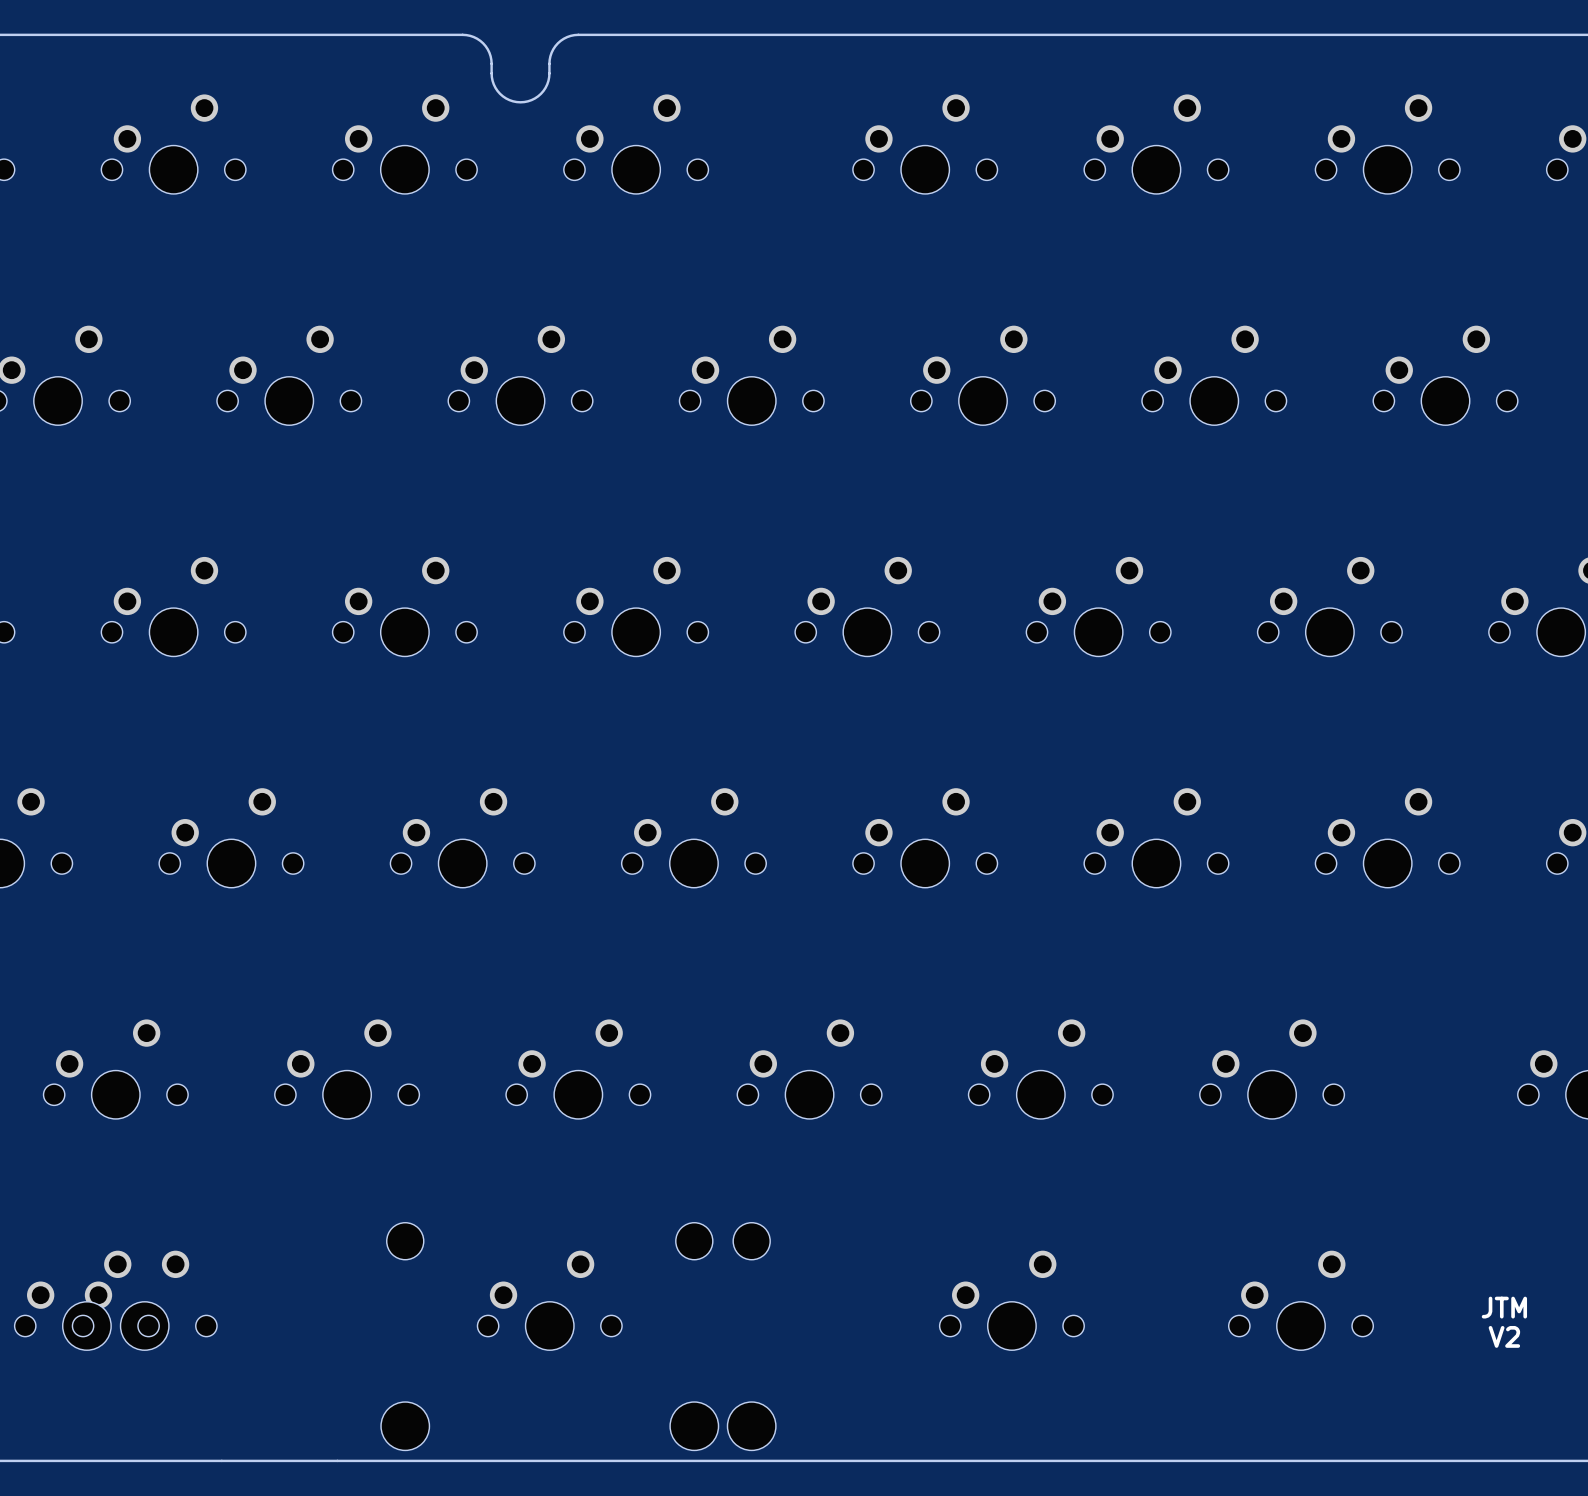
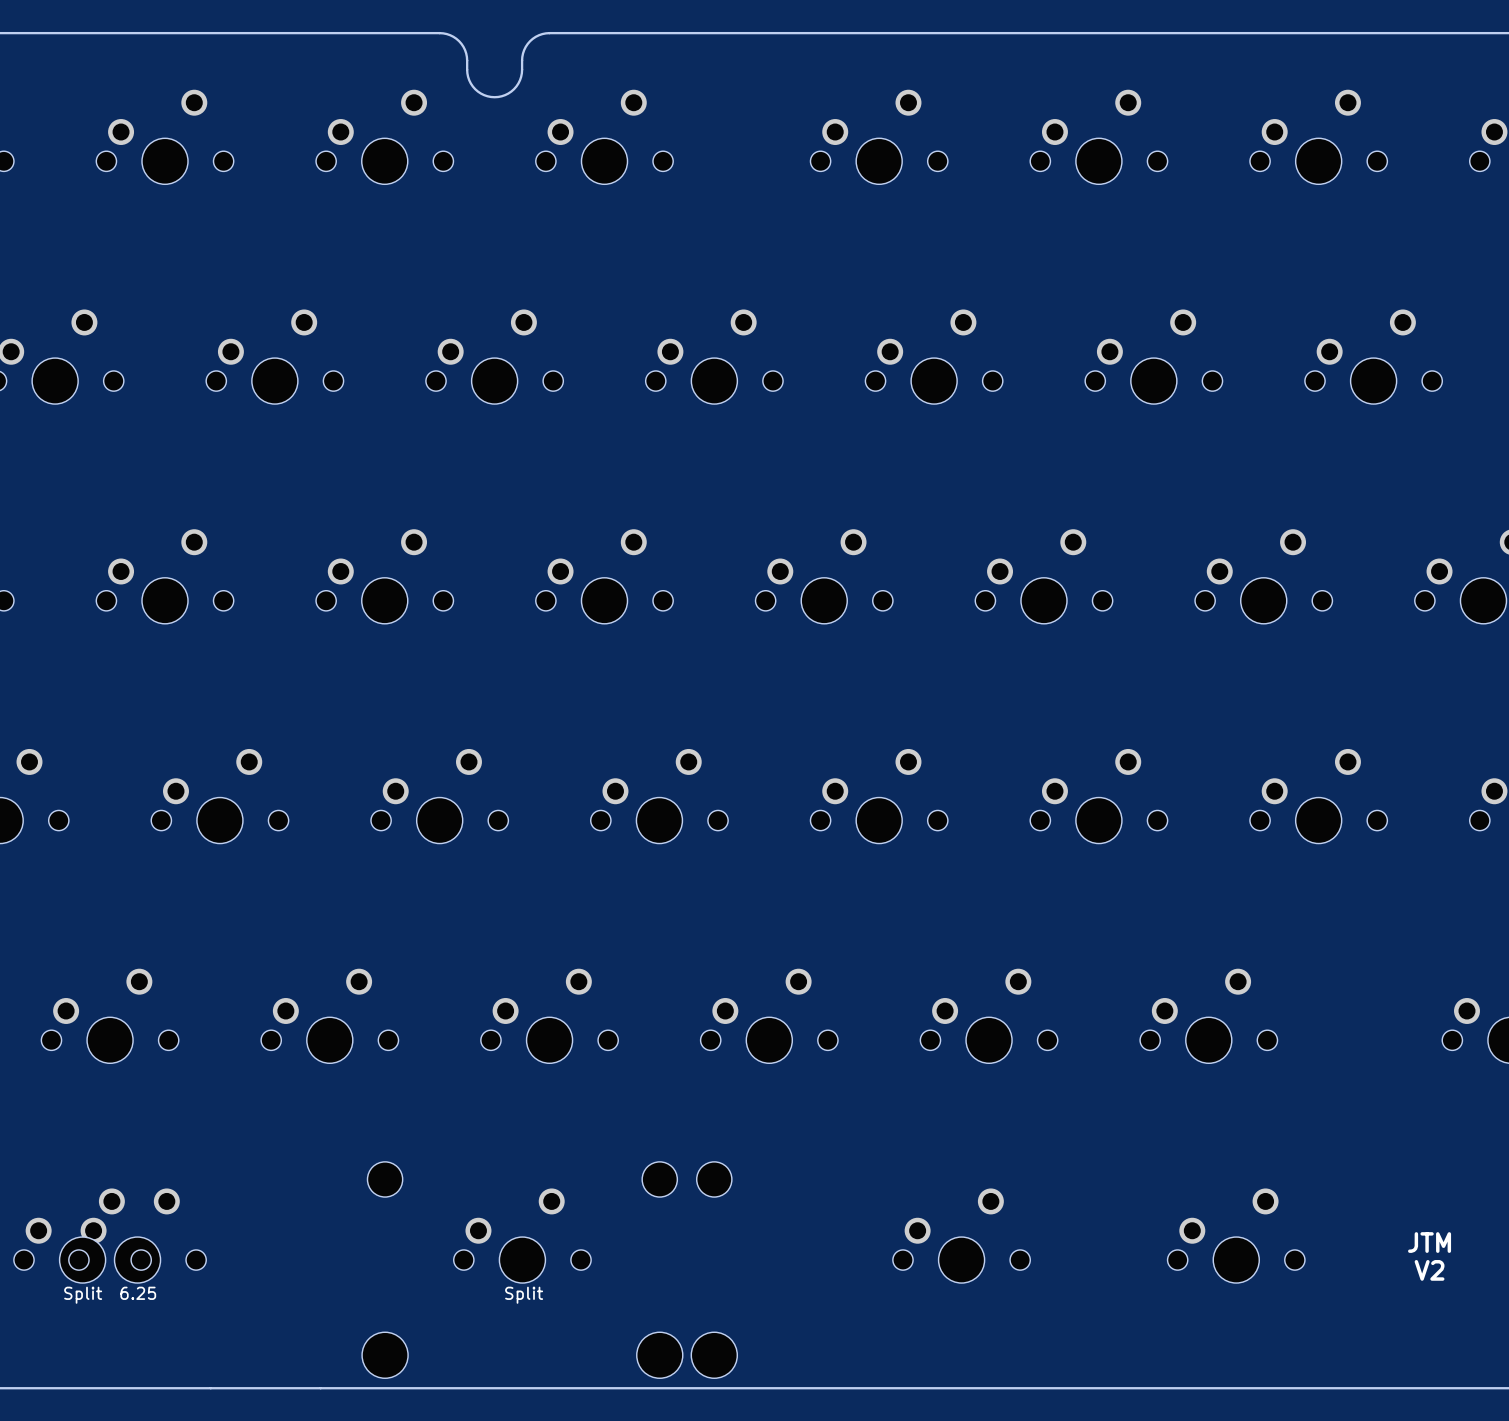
text: none -> 6.25 (138, 1293)
text: none -> Split (83, 1295)
text: none -> Split (524, 1295)

